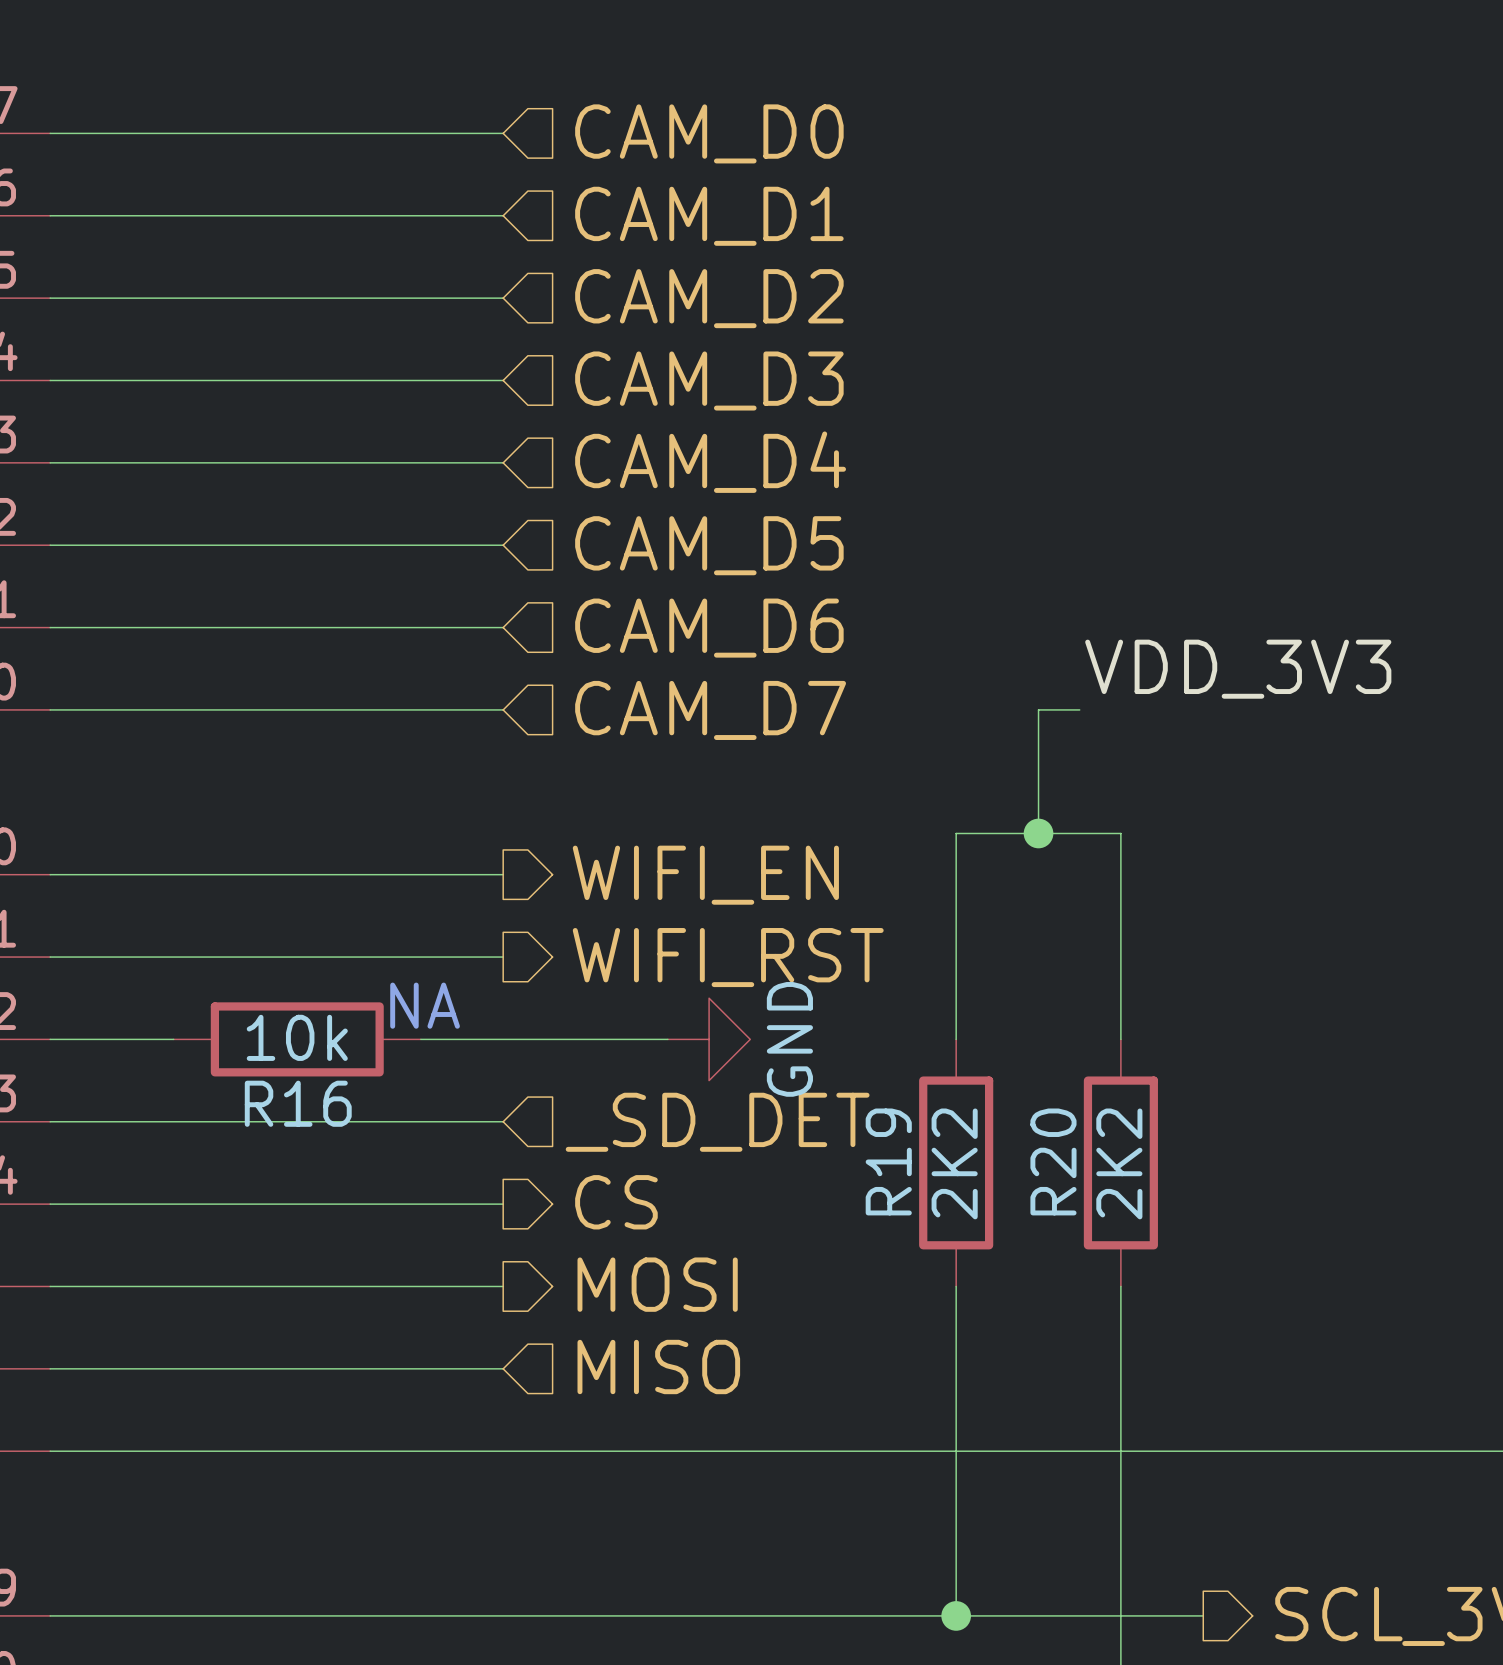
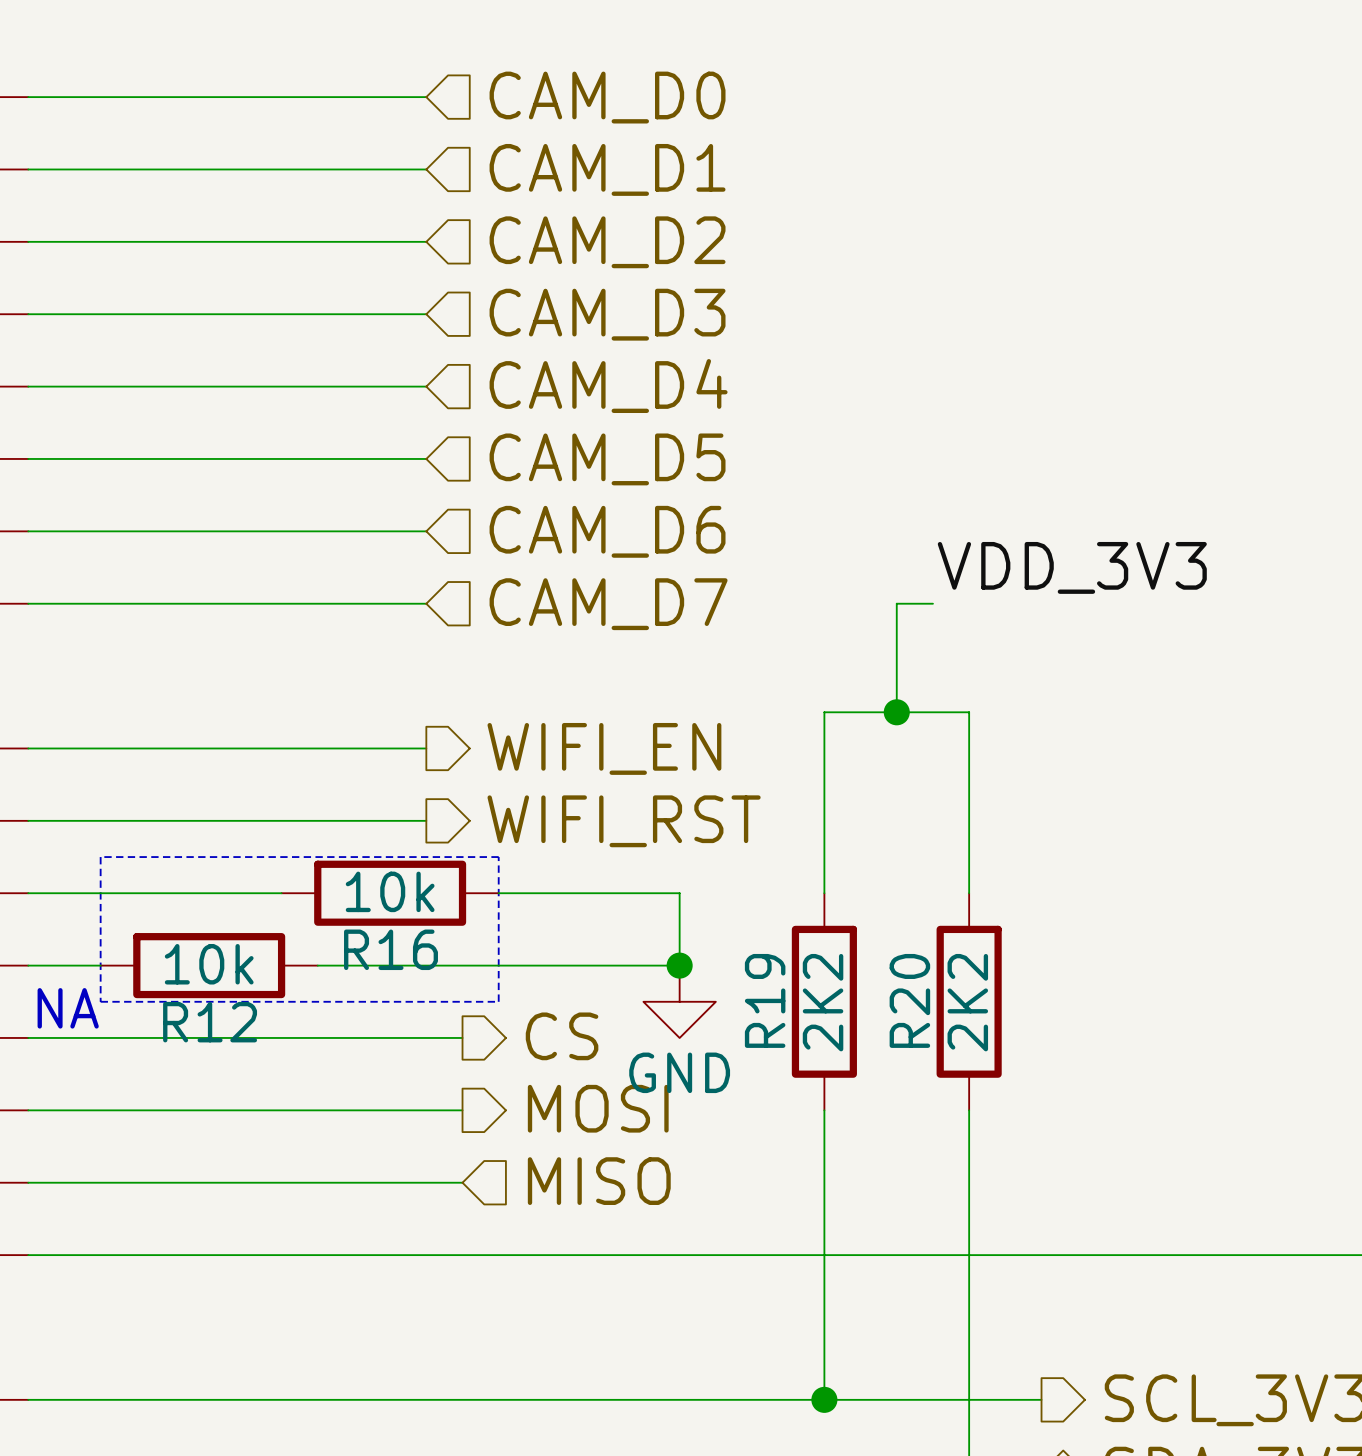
line: none -> (100, 857) (100, 1001) (498, 1001) (498, 857) (100, 857)
text position: NA (425, 1005) -> NA (68, 1008)
R16 position: (297, 1039) -> (390, 893)
wire: (420, 1039) (585, 1039) -> (136, 893) (281, 893)
wire: none -> (571, 893) (679, 893) (679, 965) (426, 965)
power symbol rotation: 0° (709, 1039) -> 90° clockwise (679, 1001)
power symbol position: GND (709, 1039) -> GND (679, 1001)
wire: (132, 1121) (379, 1121) -> none
R12: none -> 10k (209, 965)
junction: none -> (679, 965)
hierarchical label: _SD_DET (717, 1122) -> none
hierarchical label position: CS (616, 1202) -> CS (562, 1036)
wire: none -> (426, 1037) (462, 1037)
hierarchical label position: MOSI (657, 1284) -> MOSI (598, 1108)
wire: none -> (426, 1110) (462, 1110)
hierarchical label position: MISO (658, 1367) -> MISO (599, 1181)
wire: none -> (426, 1182) (462, 1182)

